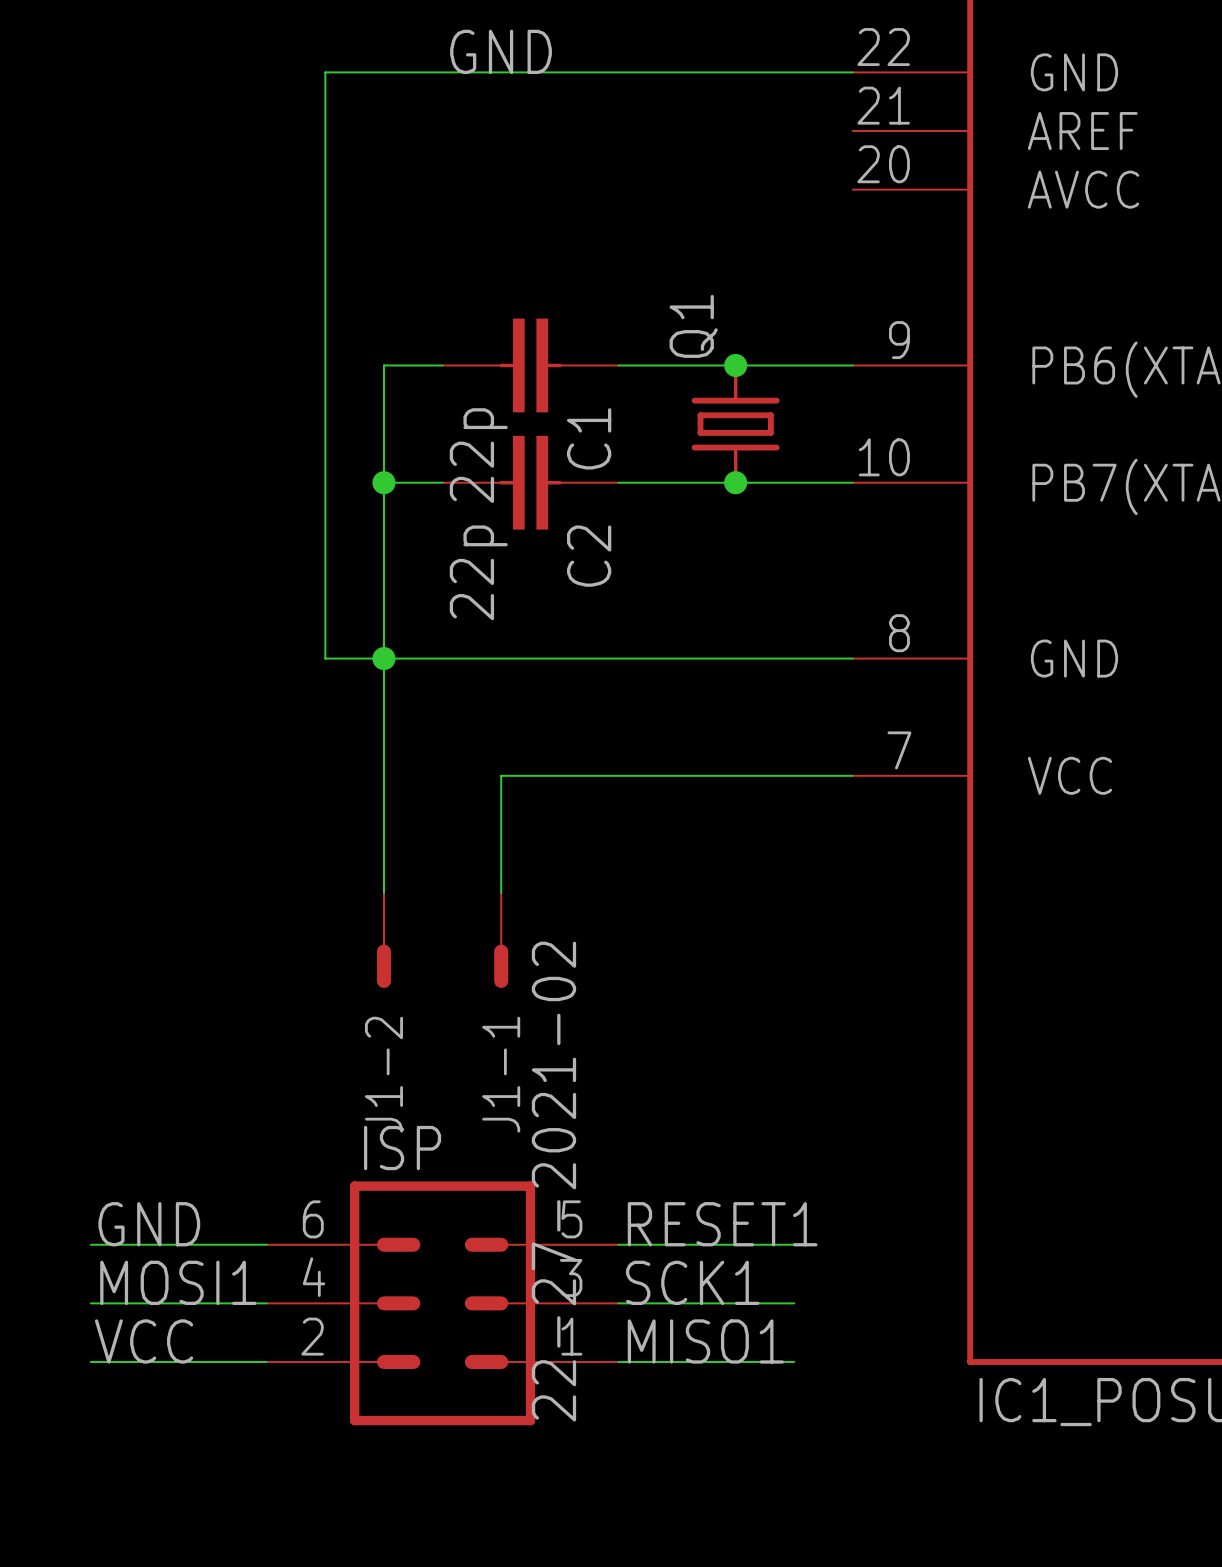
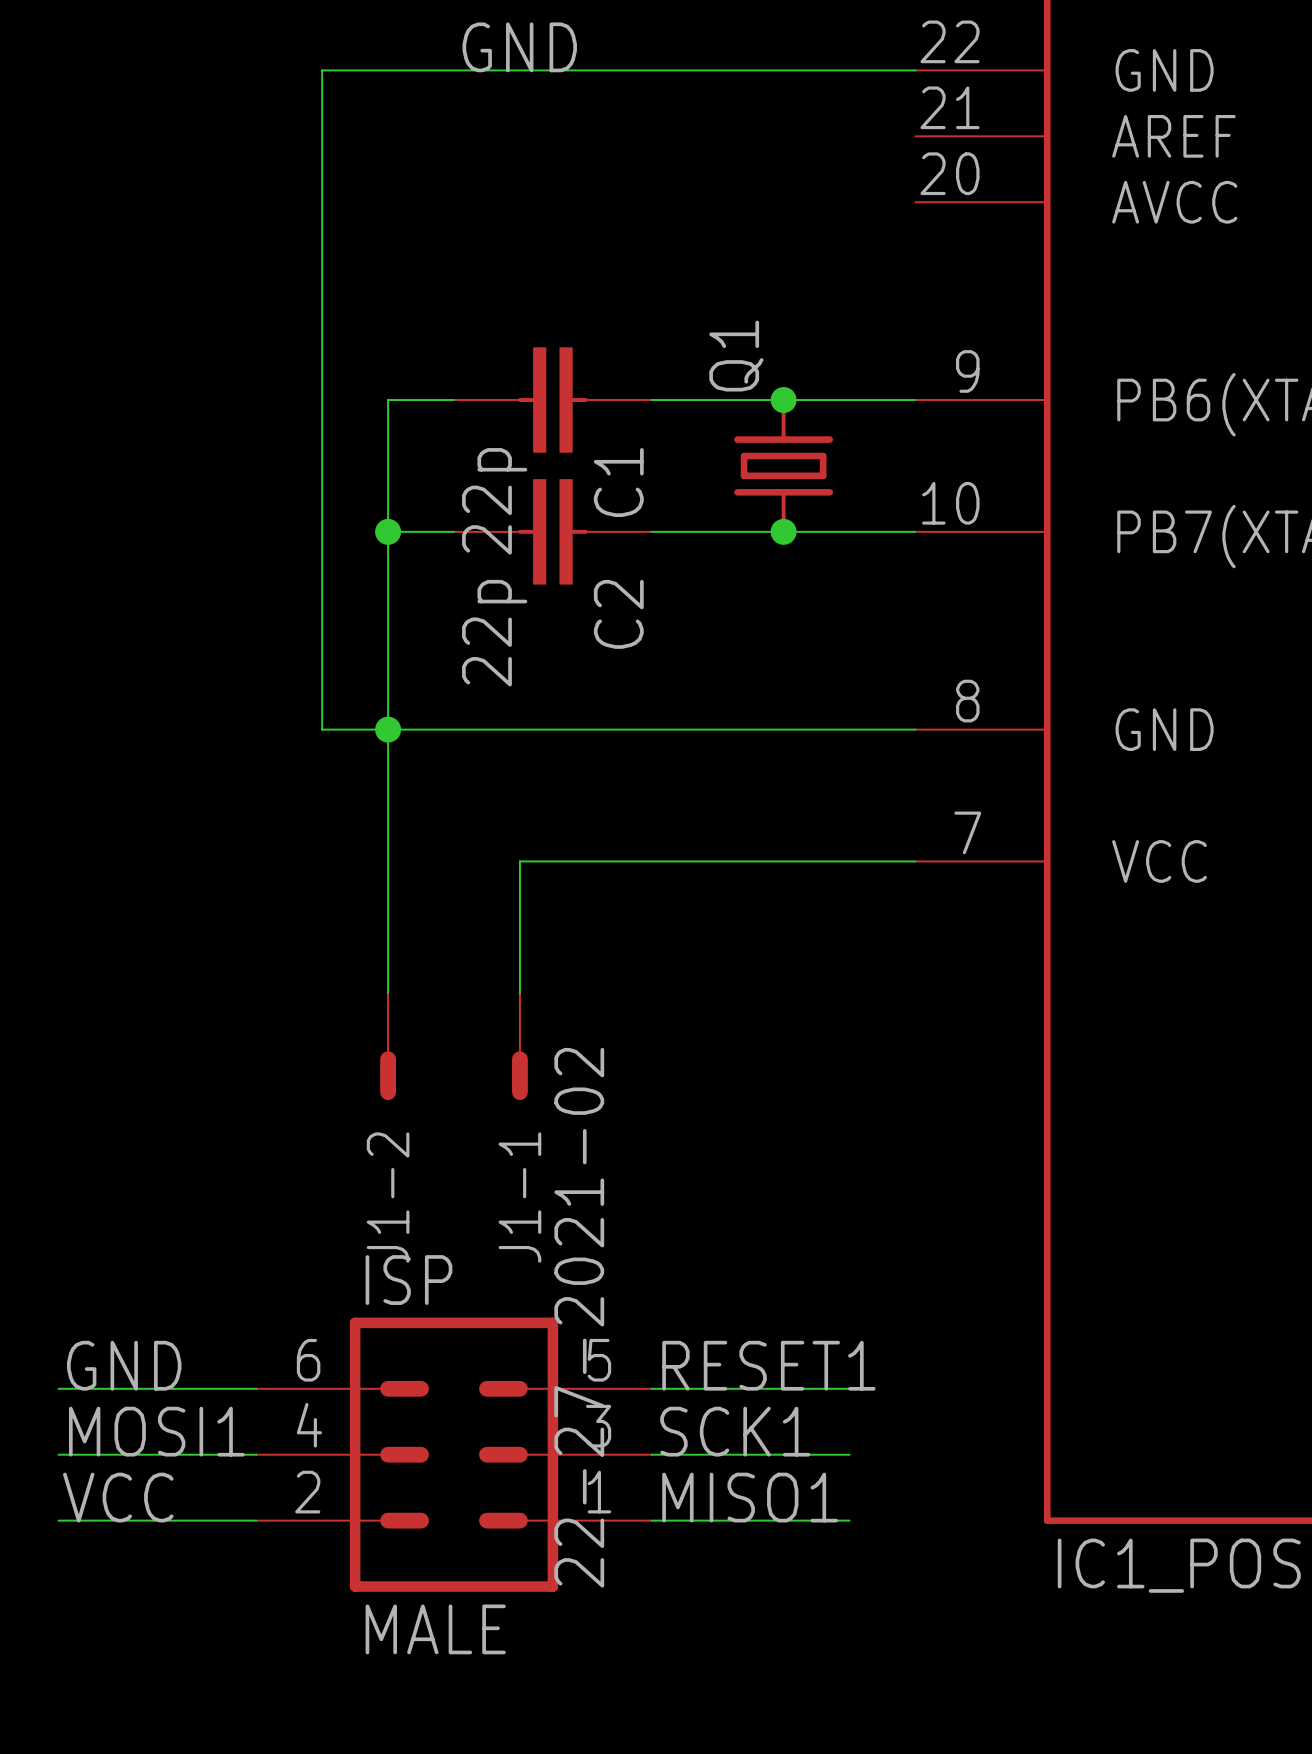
ISP value: none -> MALE (435, 1629)

